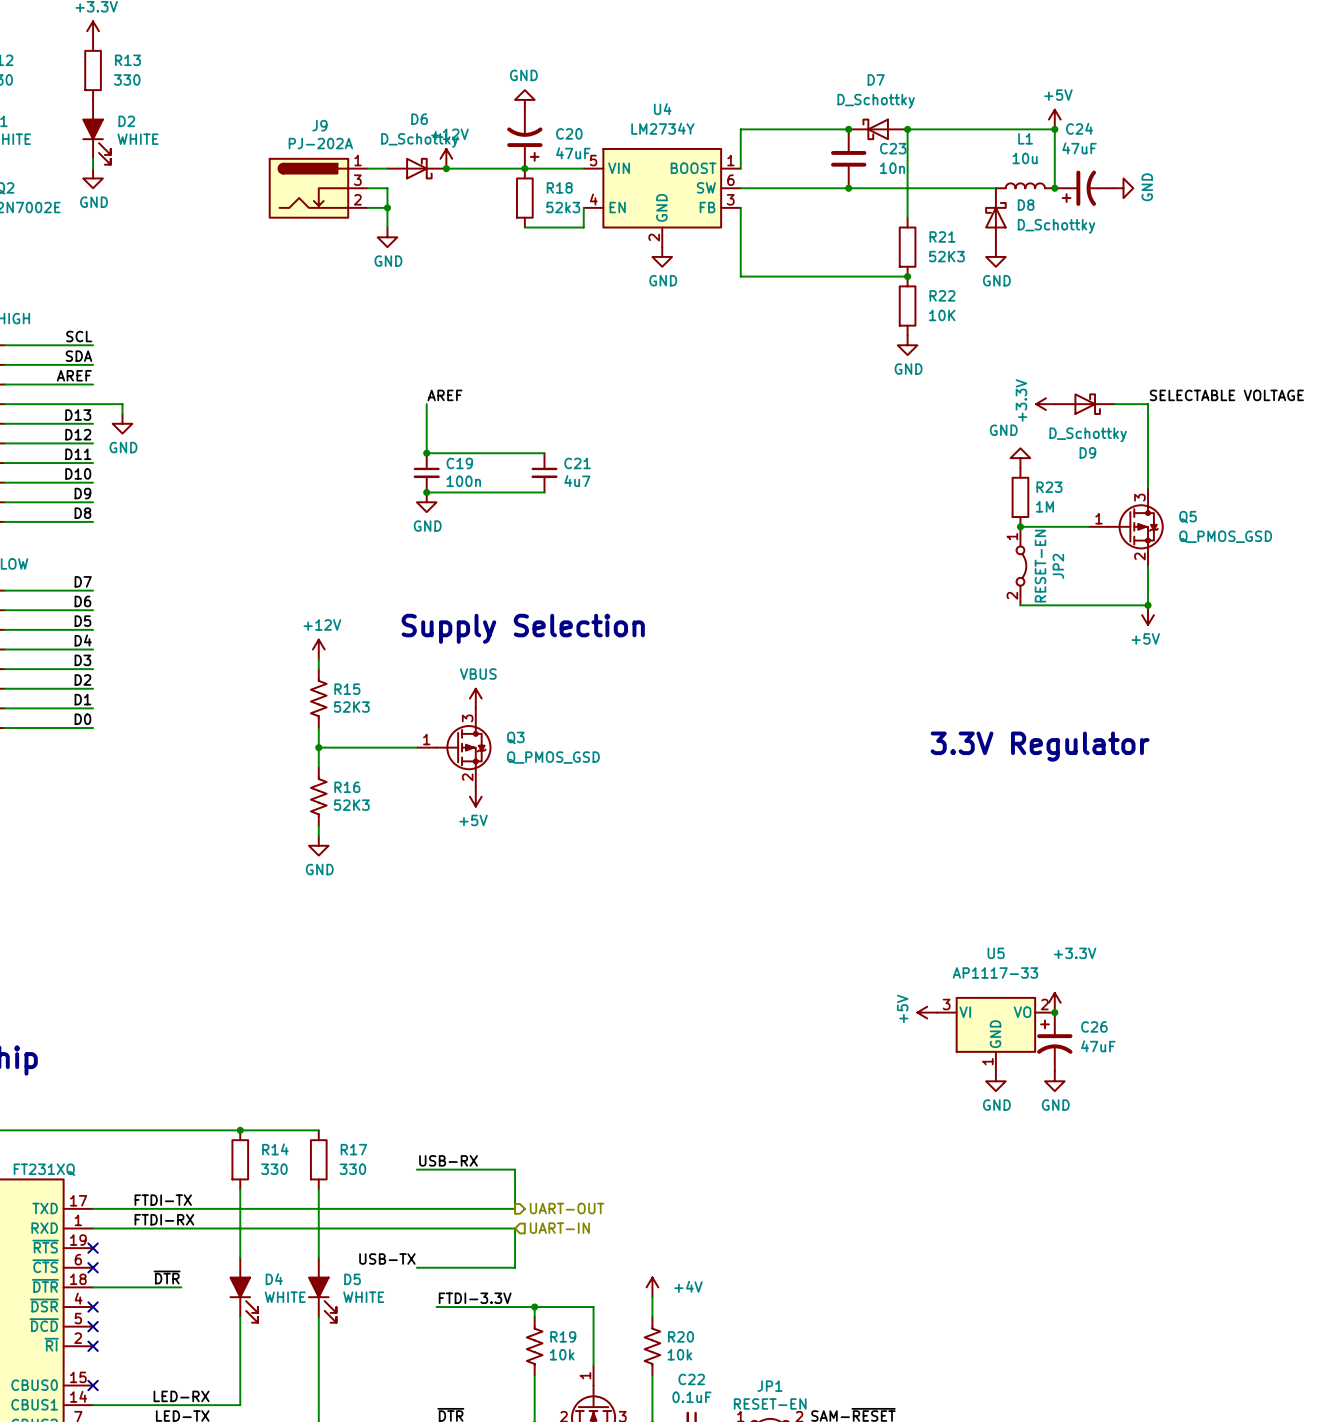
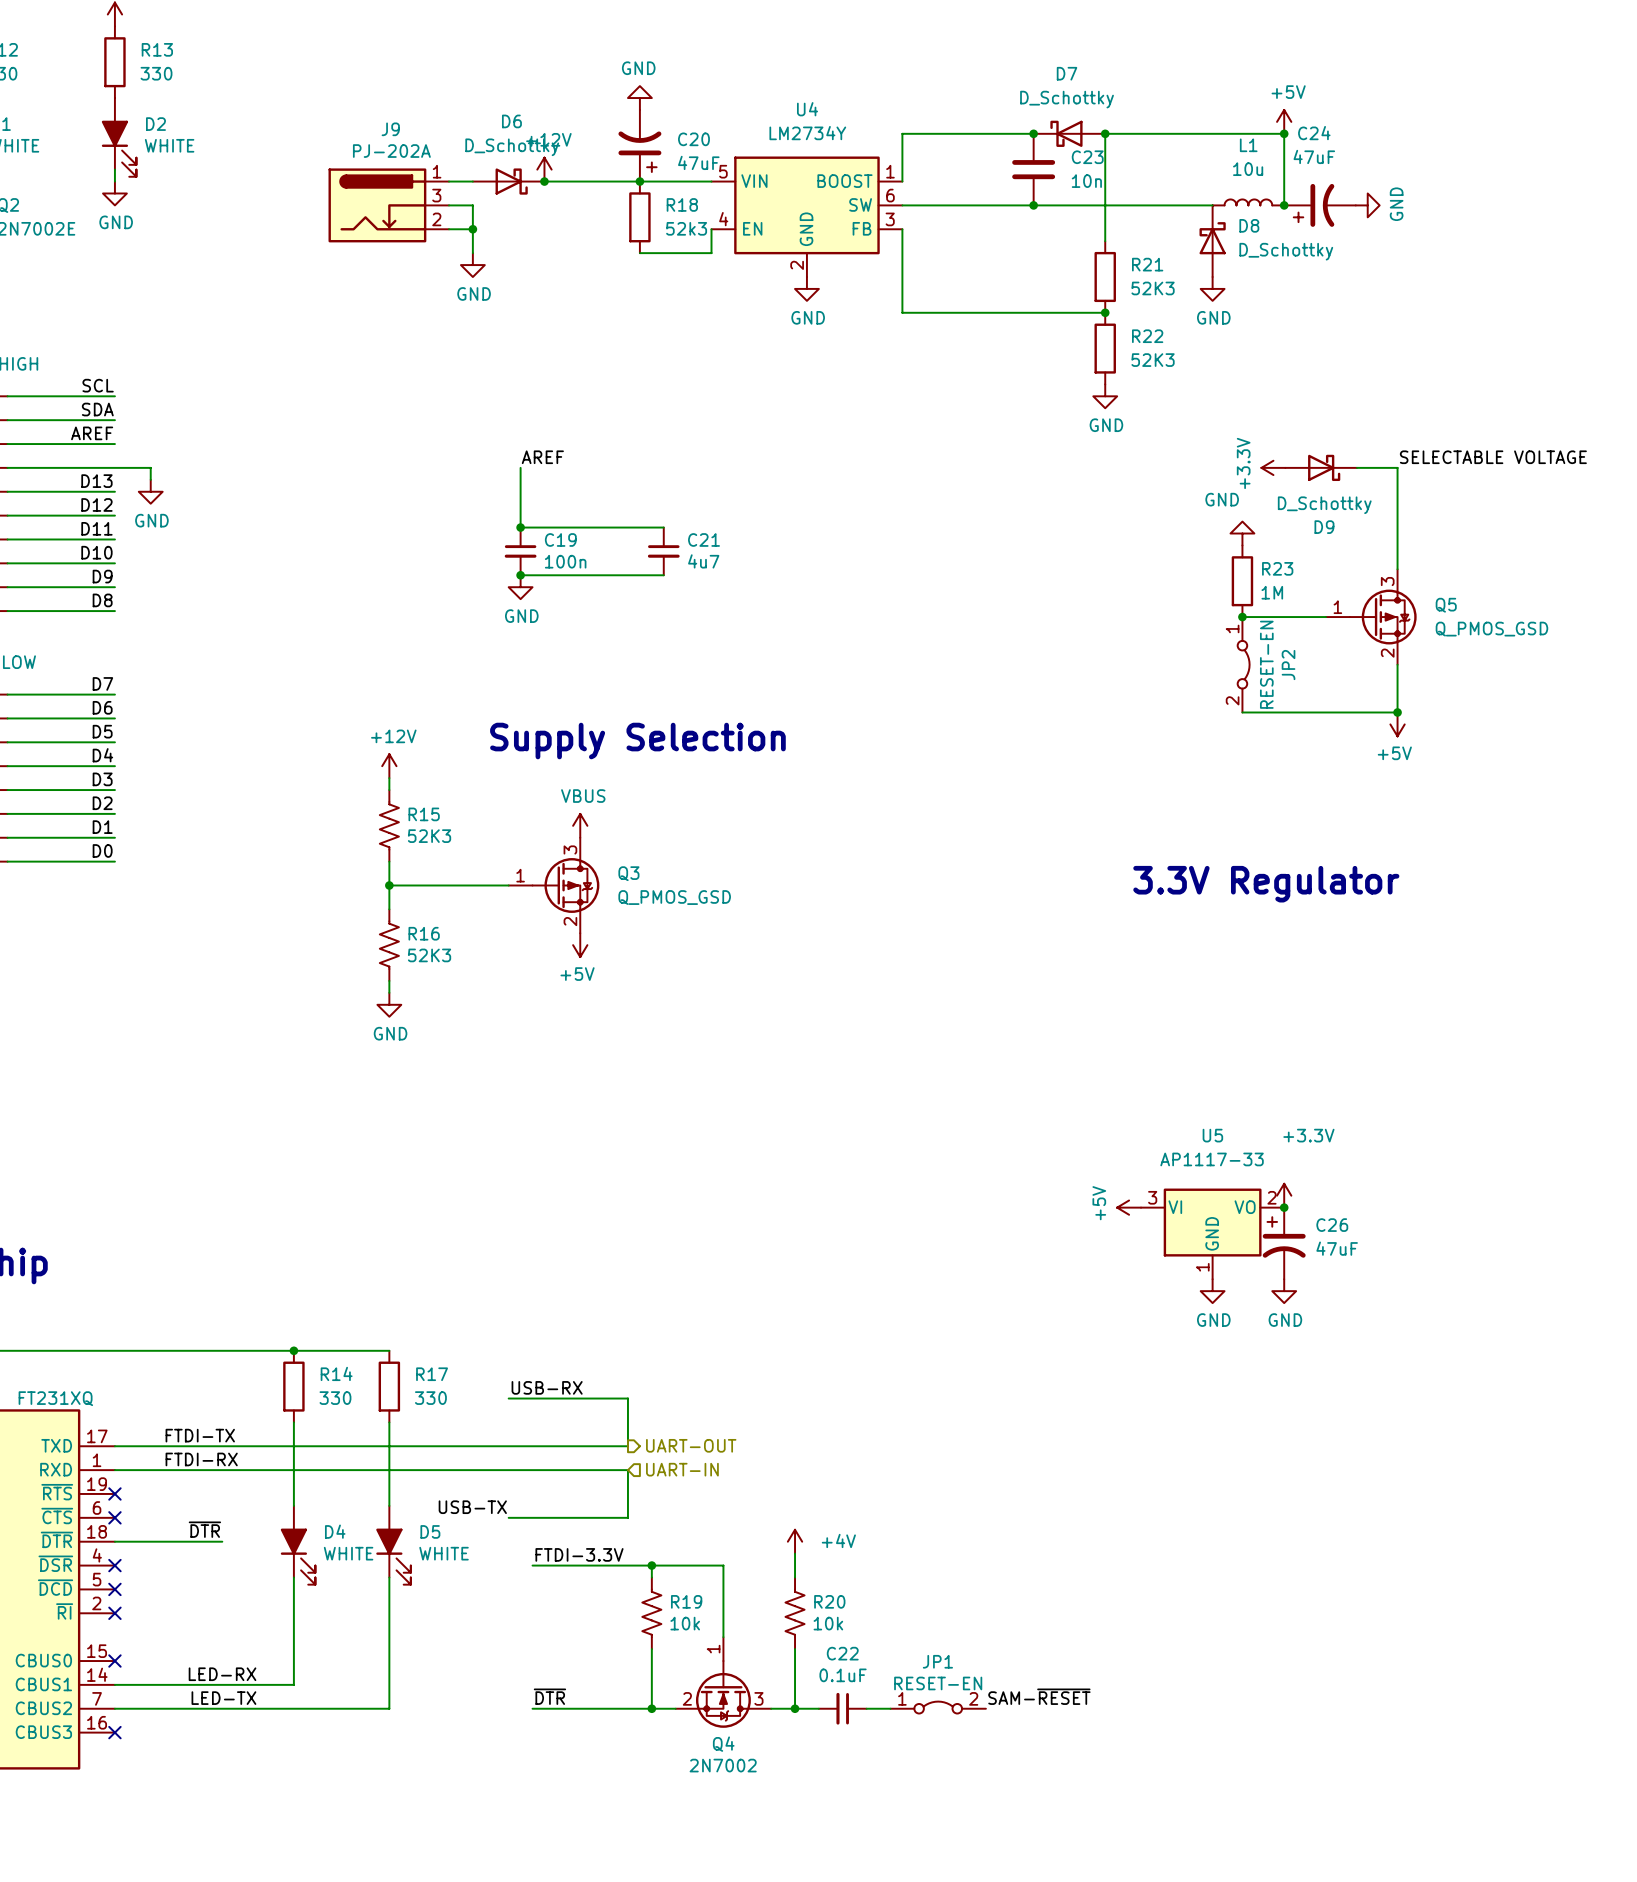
R22 value: 10K (942, 315) -> 52K3 (1153, 360)

